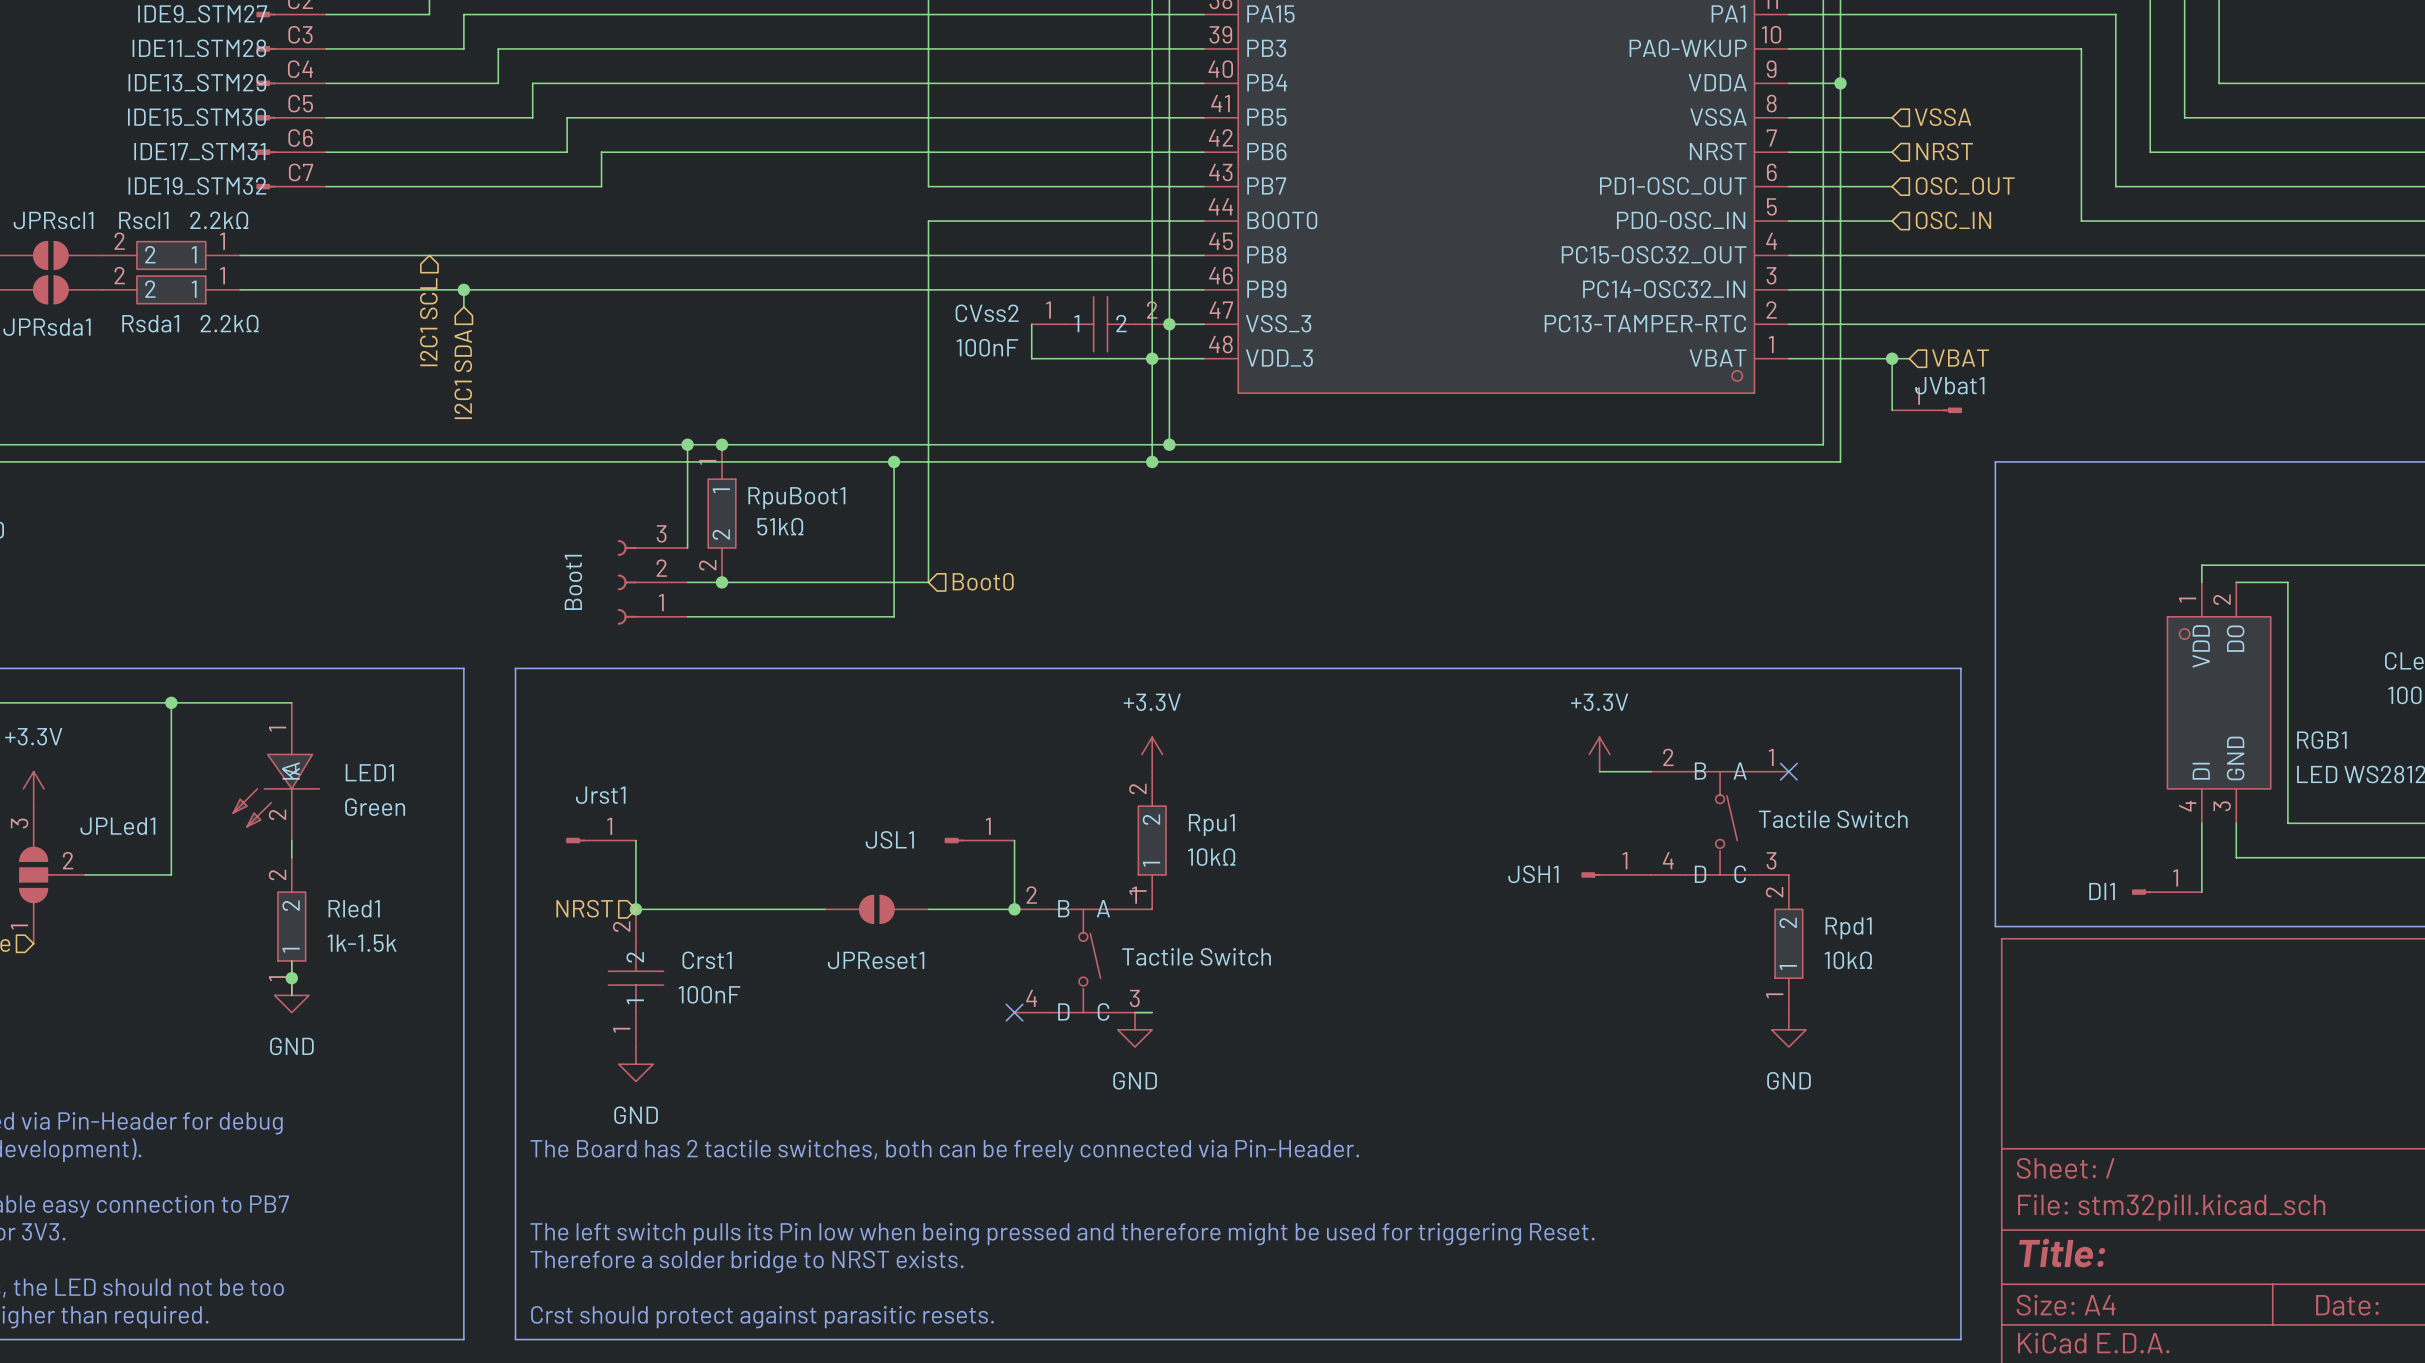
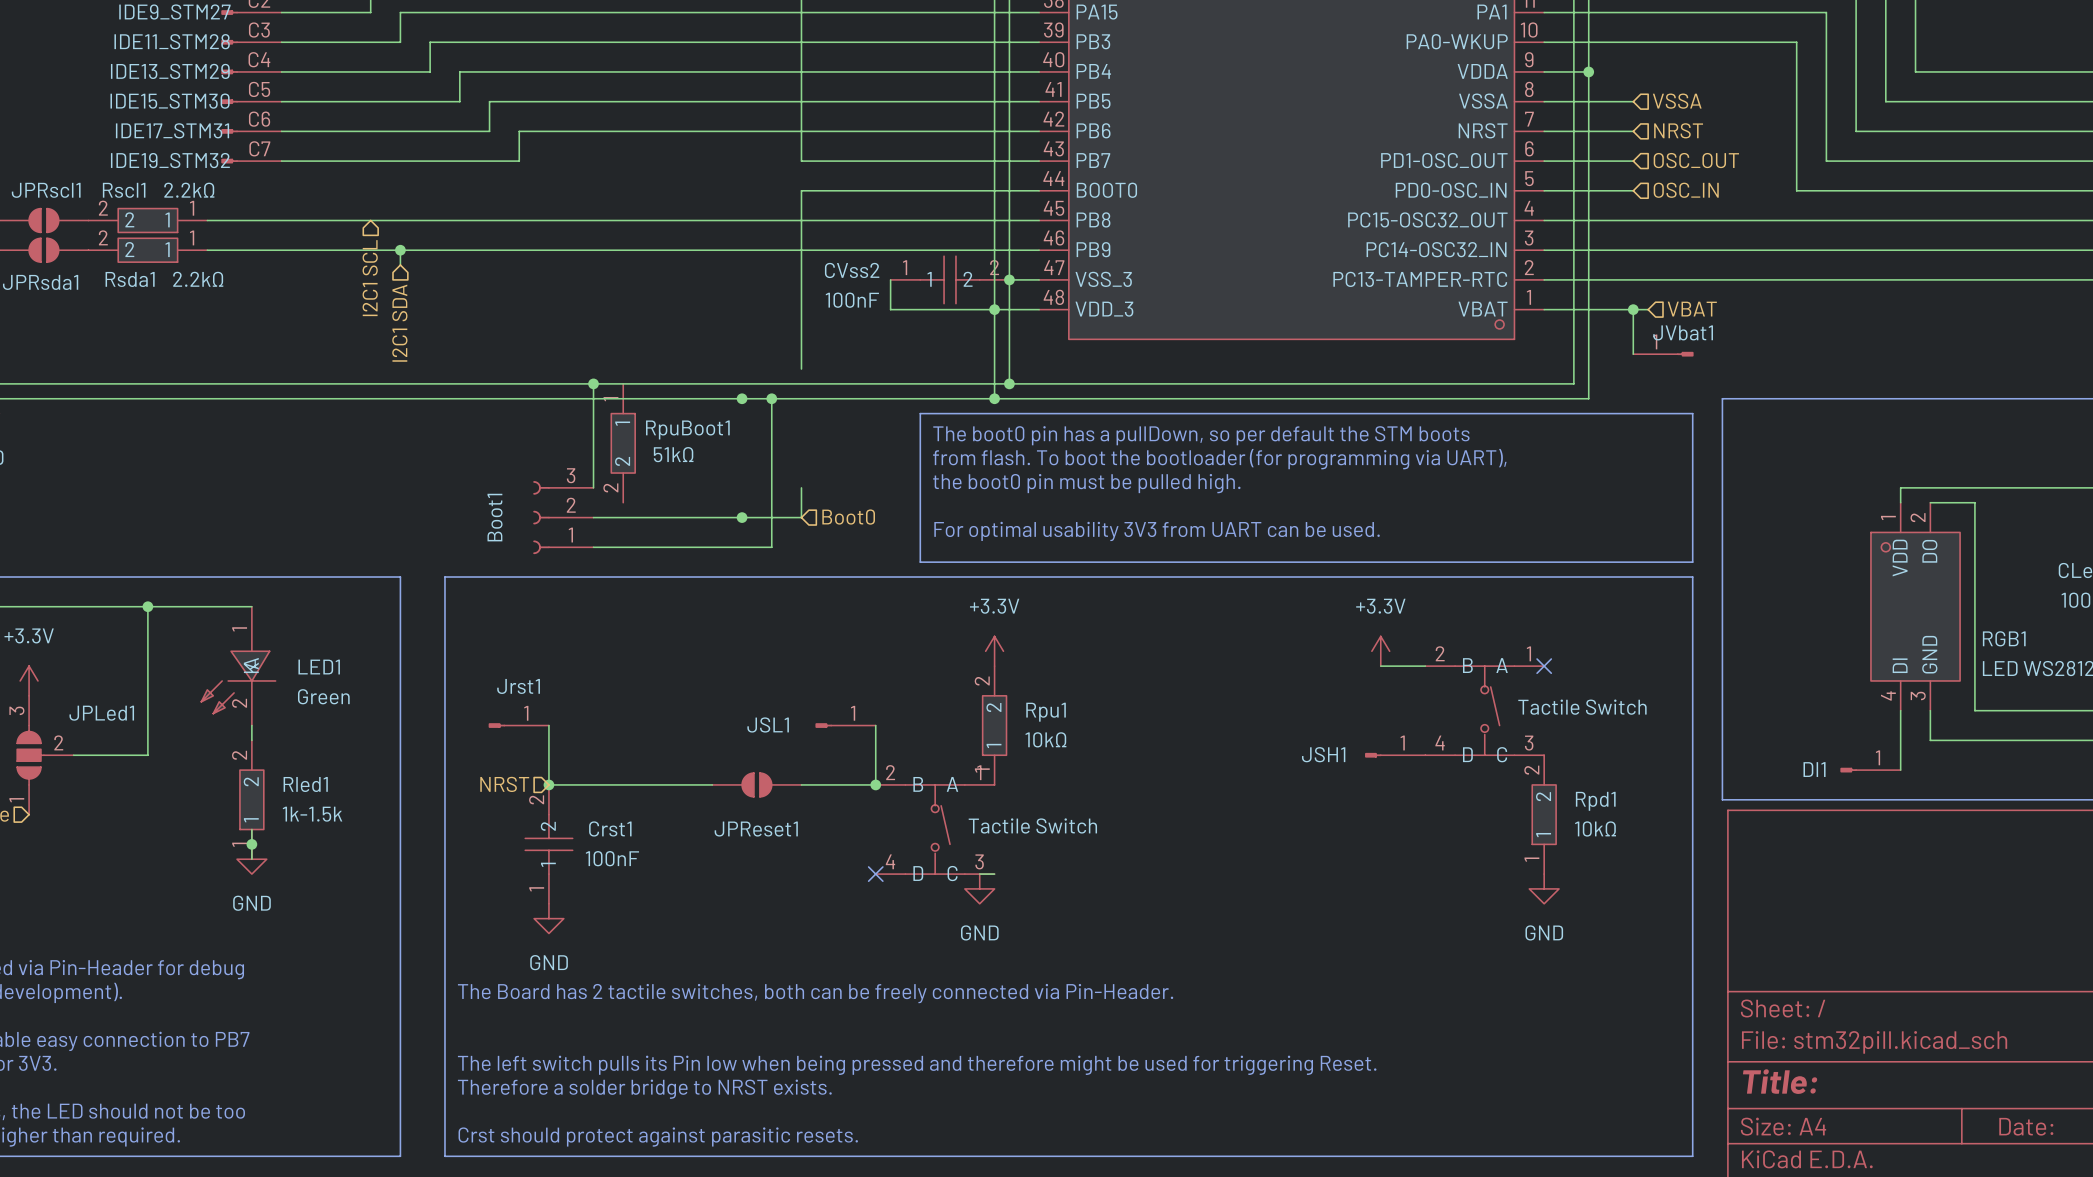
wire: (928, 427) (928, 565) -> none
junction: (721, 444) -> none
junction: none -> (742, 398)
line: none -> (920, 413) (1692, 413) (1692, 562) (920, 562) (920, 413)
text: none -> The boot0 pin has a pullDown, so per default the STM boots (1201, 435)
text: none -> from flash. To boot the bootloader (for programming via UART), (1219, 459)
wire: none -> (593, 473) (593, 487)
text: none -> the boot0 pin must be pulled high. (1086, 483)
hierarchical label position: Boot0 (983, 581) -> Boot0 (848, 517)
Boot1 position: (652, 582) -> (563, 517)
wire: (687, 582) (928, 582) -> (593, 517) (801, 517) (801, 502)
junction: (721, 582) -> none
junction: none -> (742, 517)
text: none -> For optimal usability 3V3 from UART can be used. (1157, 531)
wire: (687, 616) (894, 616) -> (593, 547) (771, 547) (771, 532)

